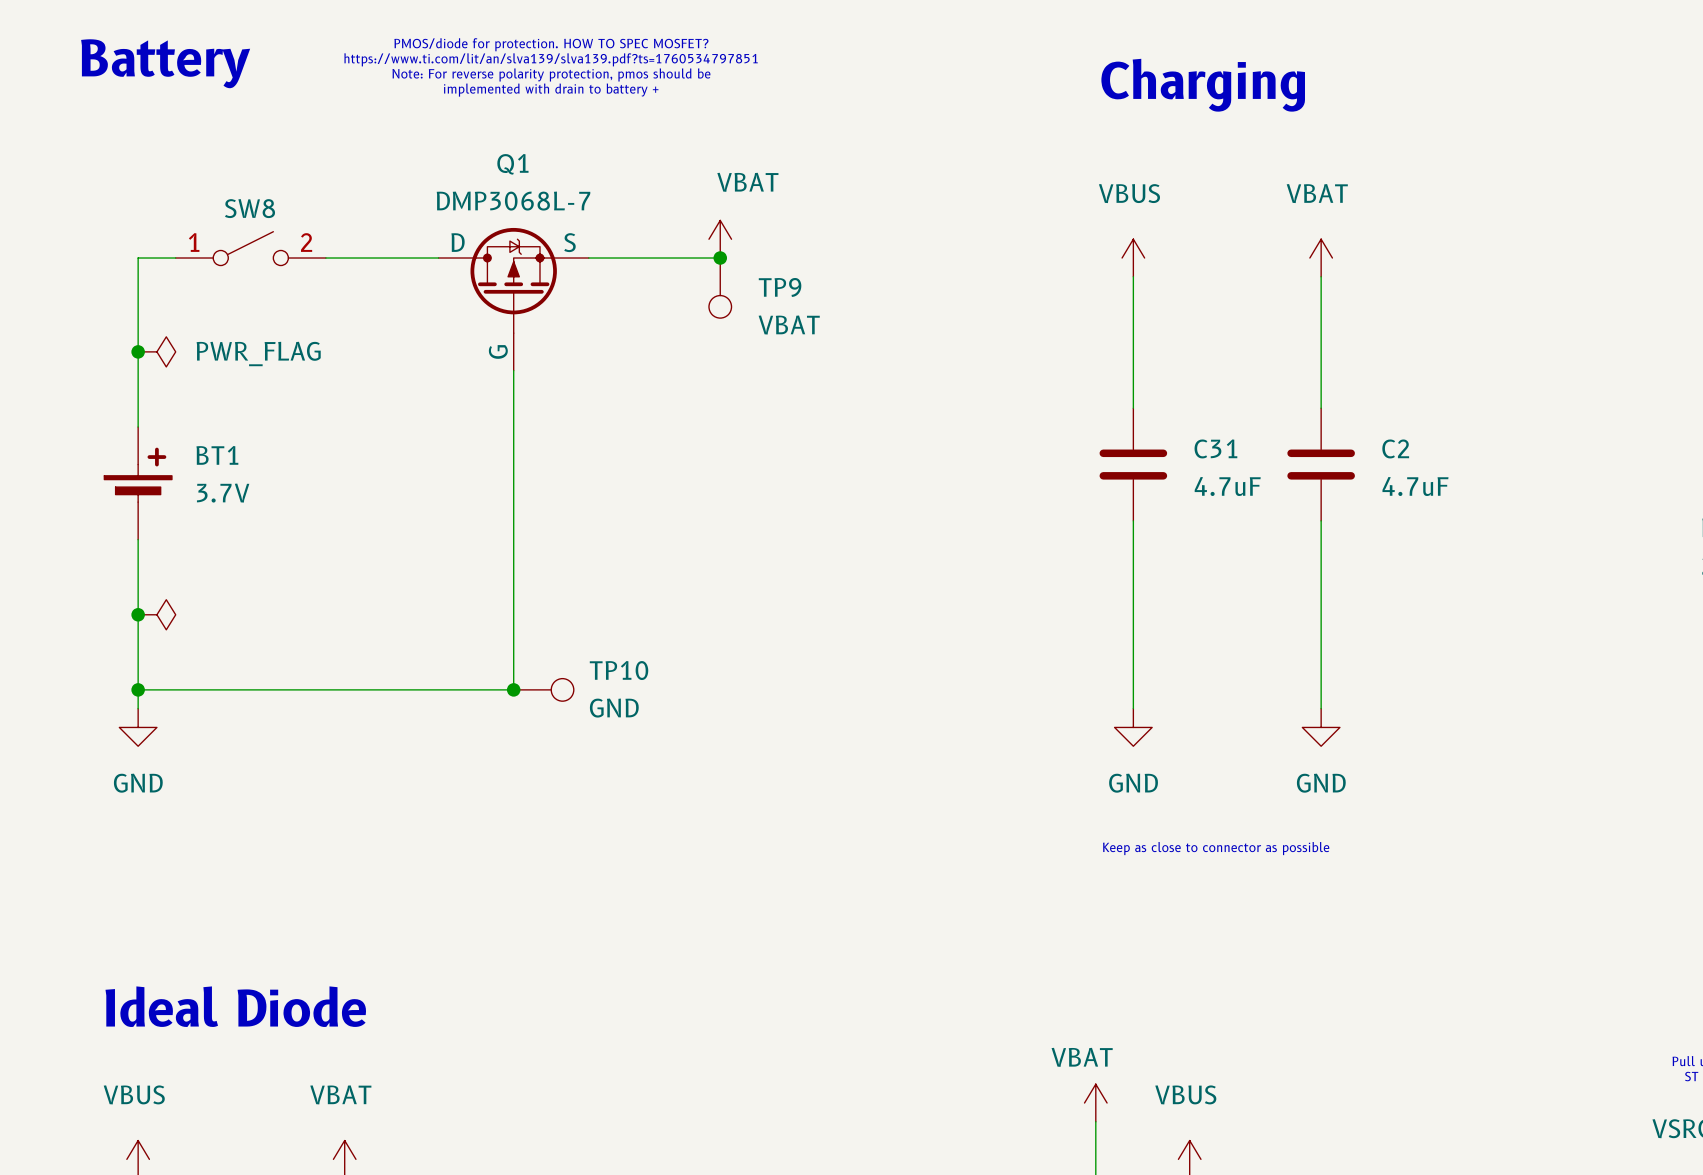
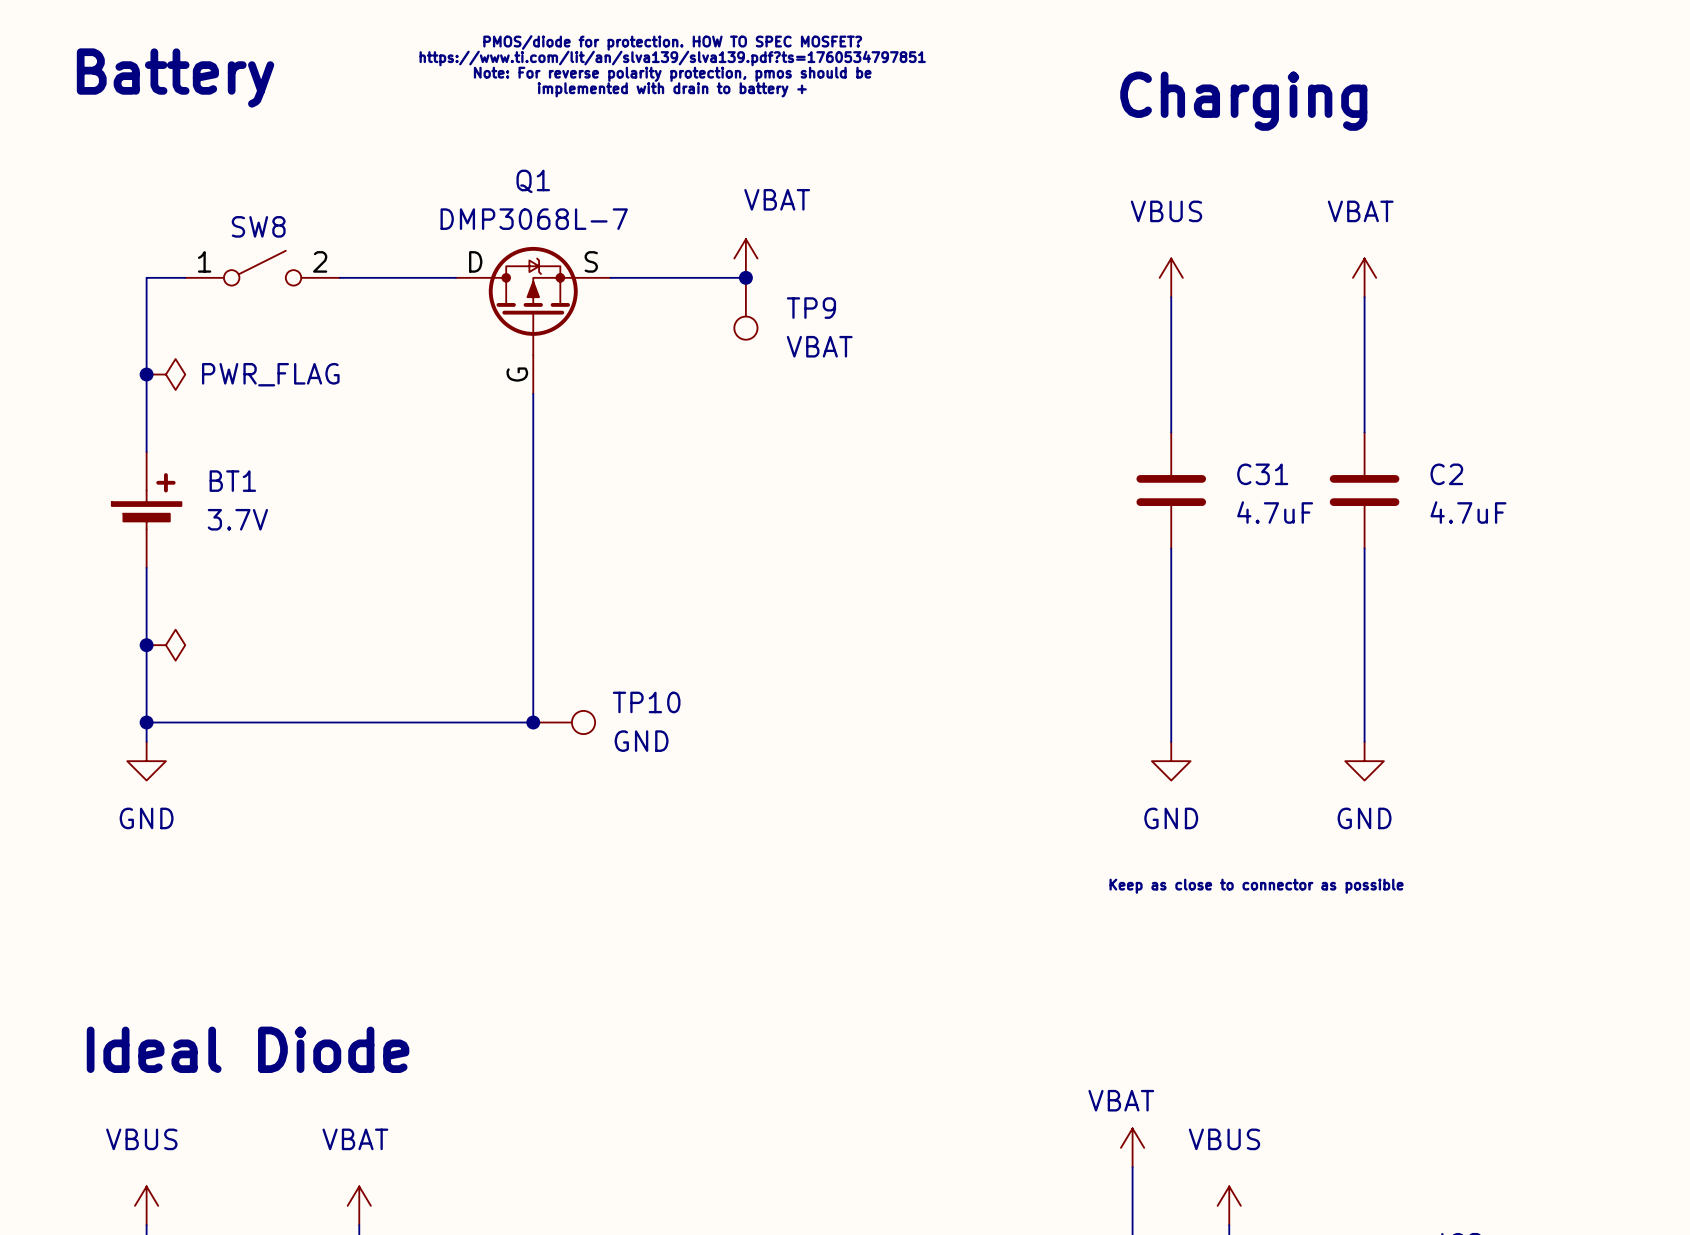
text position: PMOS/diode for protection. HOW TO SPEC MOSFET? (551, 44) -> PMOS/diode for protection. HOW TO SPEC MOSFET? (672, 42)
text position: https://www.ti.com/lit/an/slva139/slva139.pdf?ts=1760534797851 (551, 59) -> https://www.ti.com/lit/an/slva139/slva139.pdf?ts=1760534797851 (672, 58)
text position: Note: For reverse polarity protection, pmos should be (551, 74) -> Note: For reverse polarity protection, pmos should be (672, 74)
text position: implemented with drain to battery + (551, 90) -> implemented with drain to battery + (672, 89)

